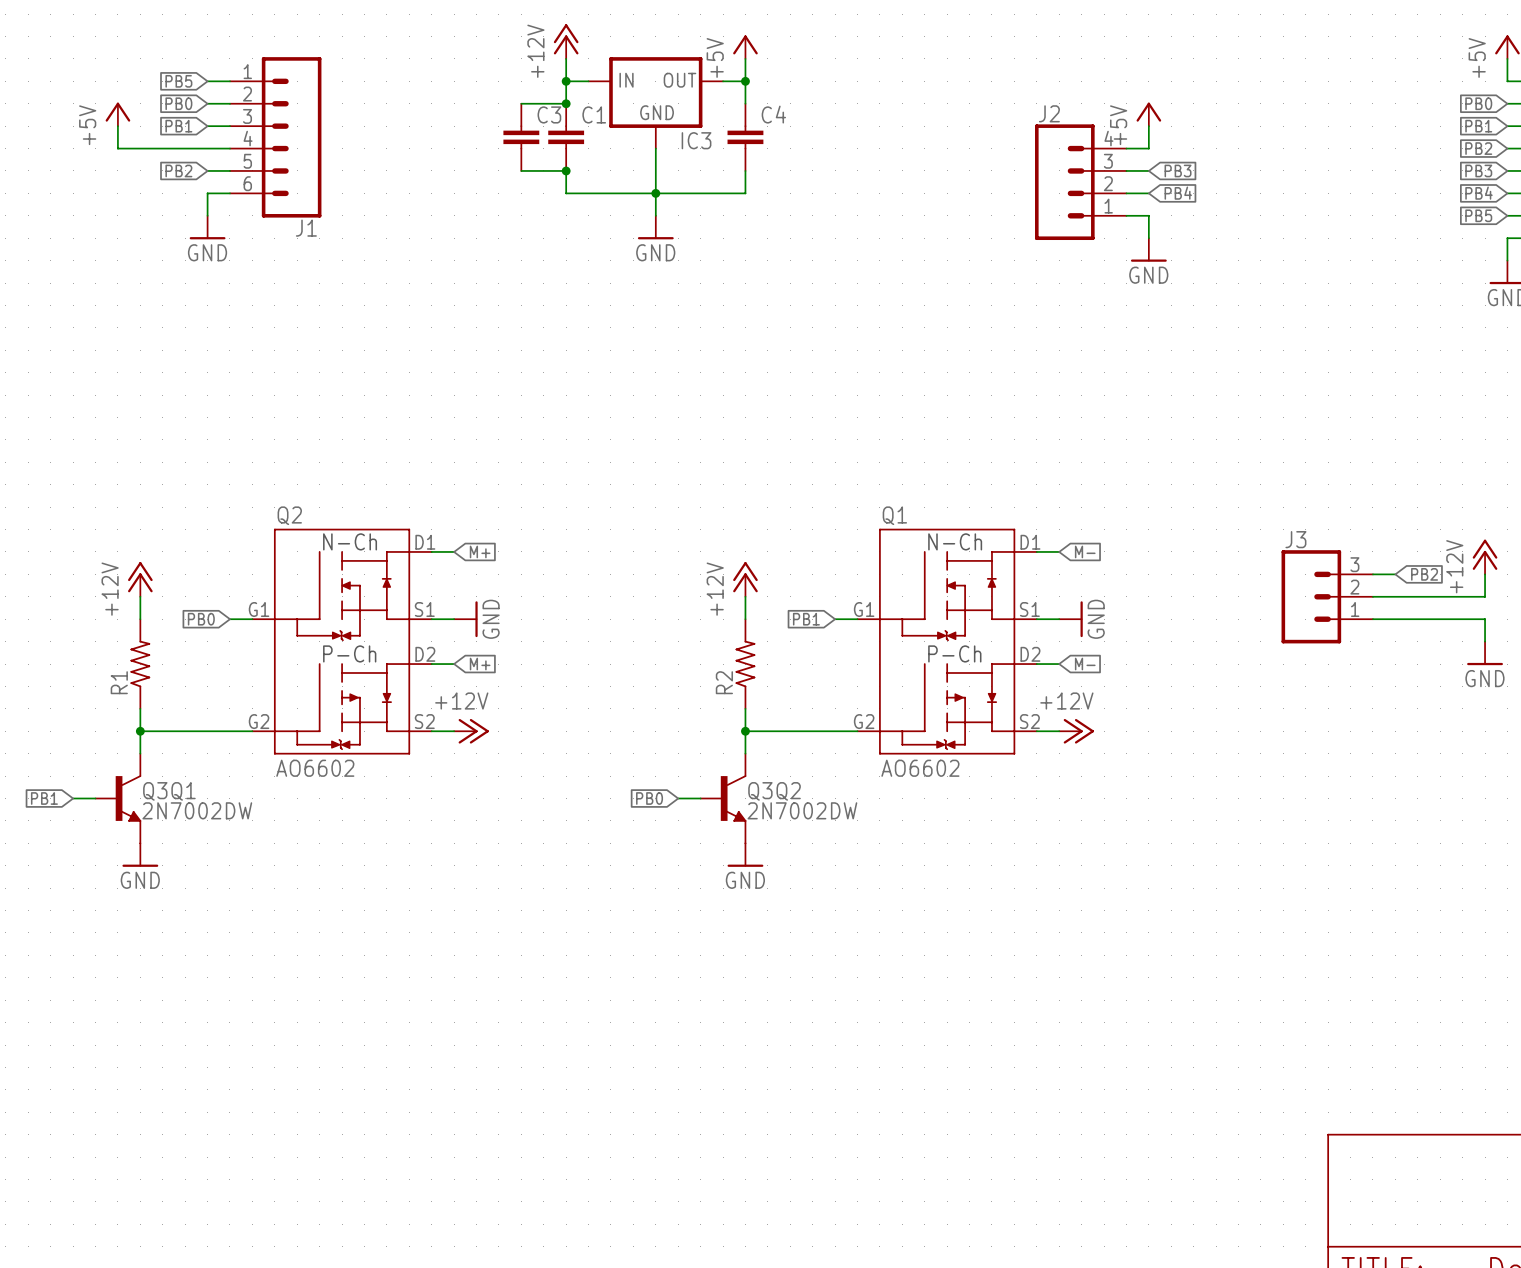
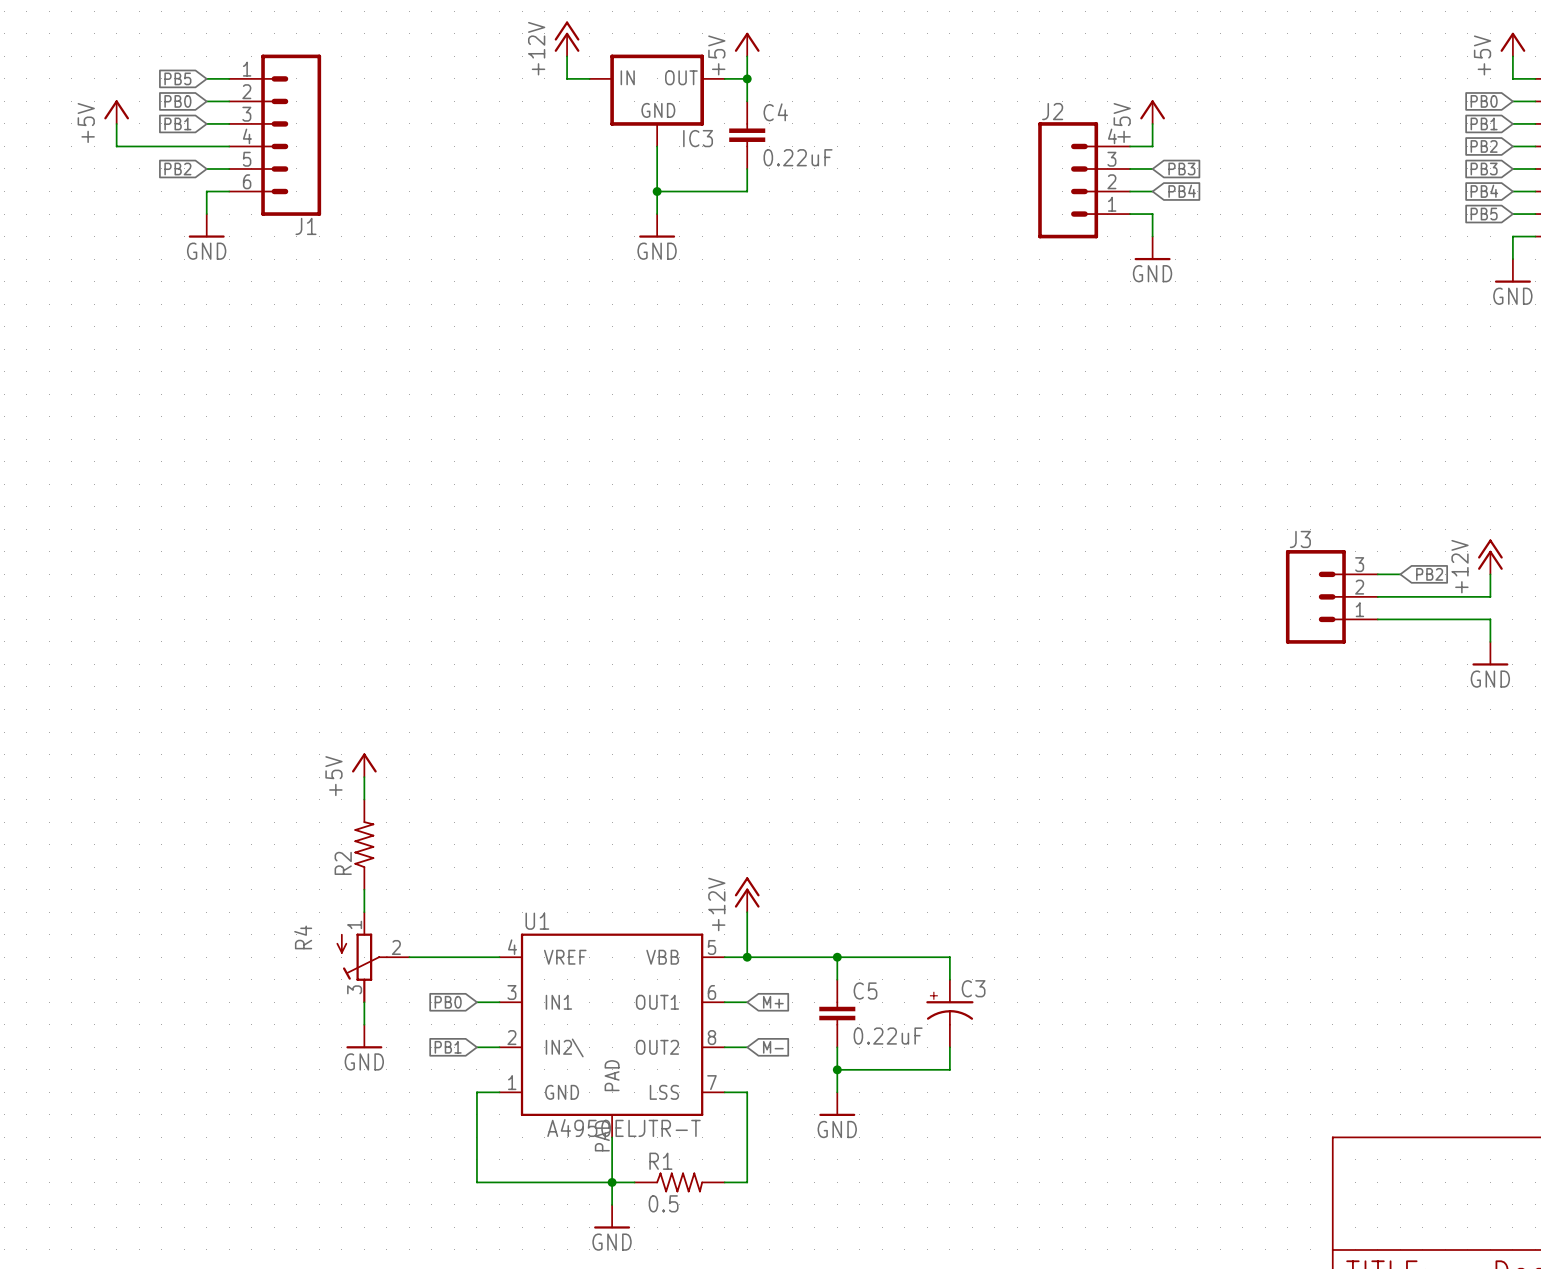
wire: (566, 81) (566, 103) (521, 103) -> none
junction: (566, 81) -> none
C3 symbol: [503, 103, 540, 171] -> [926, 979, 974, 1048]
junction: (566, 103) -> none
C1: (566, 137) -> none
C4 value: none -> 0.22uF (798, 157)
wire: (521, 170) (566, 170) (566, 193) (655, 193) -> none
junction: (566, 170) -> none
wire: (431, 551) (454, 551) -> none
global label: M+ (480, 551) -> none
wire: (1036, 551) (1059, 551) -> none
global label: M- (1085, 551) -> none
power symbol: +12V (140, 579) -> none
power symbol: +12V (745, 579) -> none
wire: (140, 596) (140, 619) -> none
wire: (745, 596) (745, 619) -> none
global label: PB0 (201, 619) -> none
wire: (229, 619) (252, 619) -> none
wire: (431, 619) (454, 619) -> none
power symbol: GND (465, 619) -> none
global label: PB1 (806, 619) -> none
wire: (835, 619) (857, 619) -> none
wire: (1036, 619) (1059, 619) -> none
power symbol: GND (1070, 619) -> none
Q2: AO6602 (342, 641) -> none
Q1: AO6602 (947, 641) -> none
R1 rotation: 0° (140, 664) -> 90° clockwise (679, 1182)
R1 position: (140, 664) -> (679, 1182)
wire: (431, 664) (454, 664) -> none
global label: M+ (480, 664) -> none
R2 position: (745, 664) -> (364, 844)
wire: (1036, 664) (1059, 664) -> none
global label: M- (1085, 664) -> none
wire: (140, 708) (140, 753) -> none
wire: (745, 708) (745, 753) -> (747, 912) (747, 957)
wire: (140, 731) (252, 731) -> none
junction: (140, 731) -> none
wire: (431, 731) (454, 731) -> none
power symbol: +12V (471, 731) -> none
wire: (745, 731) (857, 731) -> none
junction: (745, 731) -> none
wire: (1036, 731) (1059, 731) -> none
power symbol: +12V (1076, 731) -> none
power symbol: none -> +5V (364, 765)
wire: none -> (364, 777) (364, 799)
global label: PB1 (44, 798) -> none
wire: (73, 798) (95, 798) -> none
Q3Q1: 2N7002DW (118, 798) -> none
global label: PB0 (649, 798) -> none
wire: (678, 798) (700, 798) -> (724, 1002) (747, 1002)
Q3Q2: 2N7002DW (723, 798) -> none
power symbol: GND (140, 855) -> none
power symbol: GND (745, 855) -> none
wire: none -> (364, 889) (364, 912)
power symbol: none -> +12V (747, 894)
R4: none -> (373, 957)
wire: none -> (409, 957) (499, 957)
wire: none -> (724, 957) (949, 957) (949, 979)
junction: none -> (747, 957)
wire: none -> (837, 957) (837, 979)
junction: none -> (837, 957)
wire: none -> (364, 1002) (364, 1024)
global label: none -> PB0 (448, 1002)
wire: none -> (476, 1002) (499, 1002)
global label: none -> M+ (773, 1002)
C5: none -> 0.22uF (837, 1013)
U1: none -> A4950ELJTR-T (612, 1035)
power symbol: none -> GND (364, 1036)
global label: none -> PB1 (448, 1047)
wire: none -> (476, 1047) (499, 1047)
wire: none -> (724, 1047) (747, 1047)
global label: none -> M- (773, 1047)
wire: none -> (837, 1047) (837, 1092)
wire: none -> (949, 1047) (949, 1069) (837, 1069)
junction: none -> (837, 1069)
wire: none -> (499, 1092) (476, 1092) (476, 1182) (634, 1182)
wire: none -> (724, 1092) (747, 1092) (747, 1182) (724, 1182)
power symbol: none -> GND (837, 1104)
wire: none -> (612, 1137) (612, 1204)
junction: none -> (612, 1182)
R1 value: none -> 0.5 (663, 1203)
power symbol: none -> GND (612, 1216)

